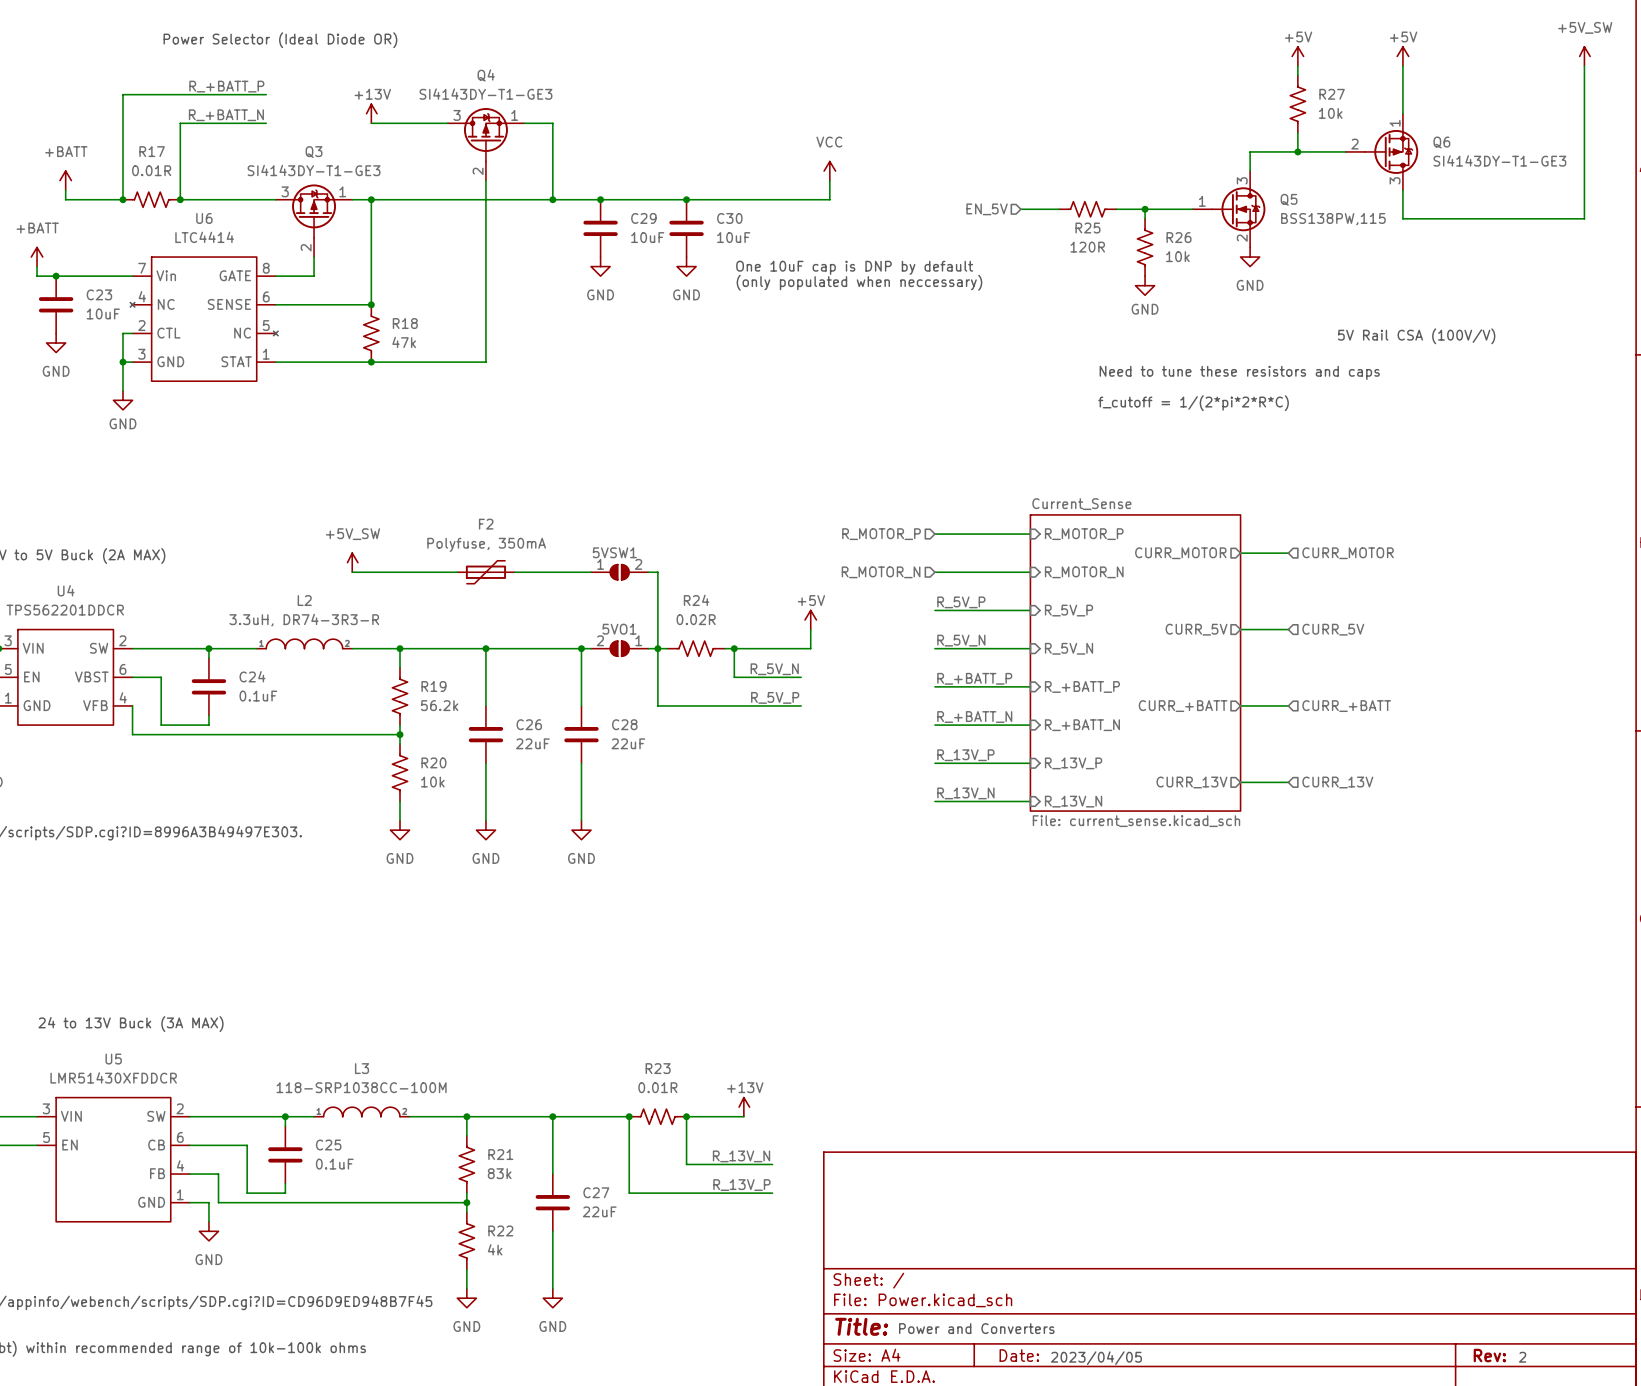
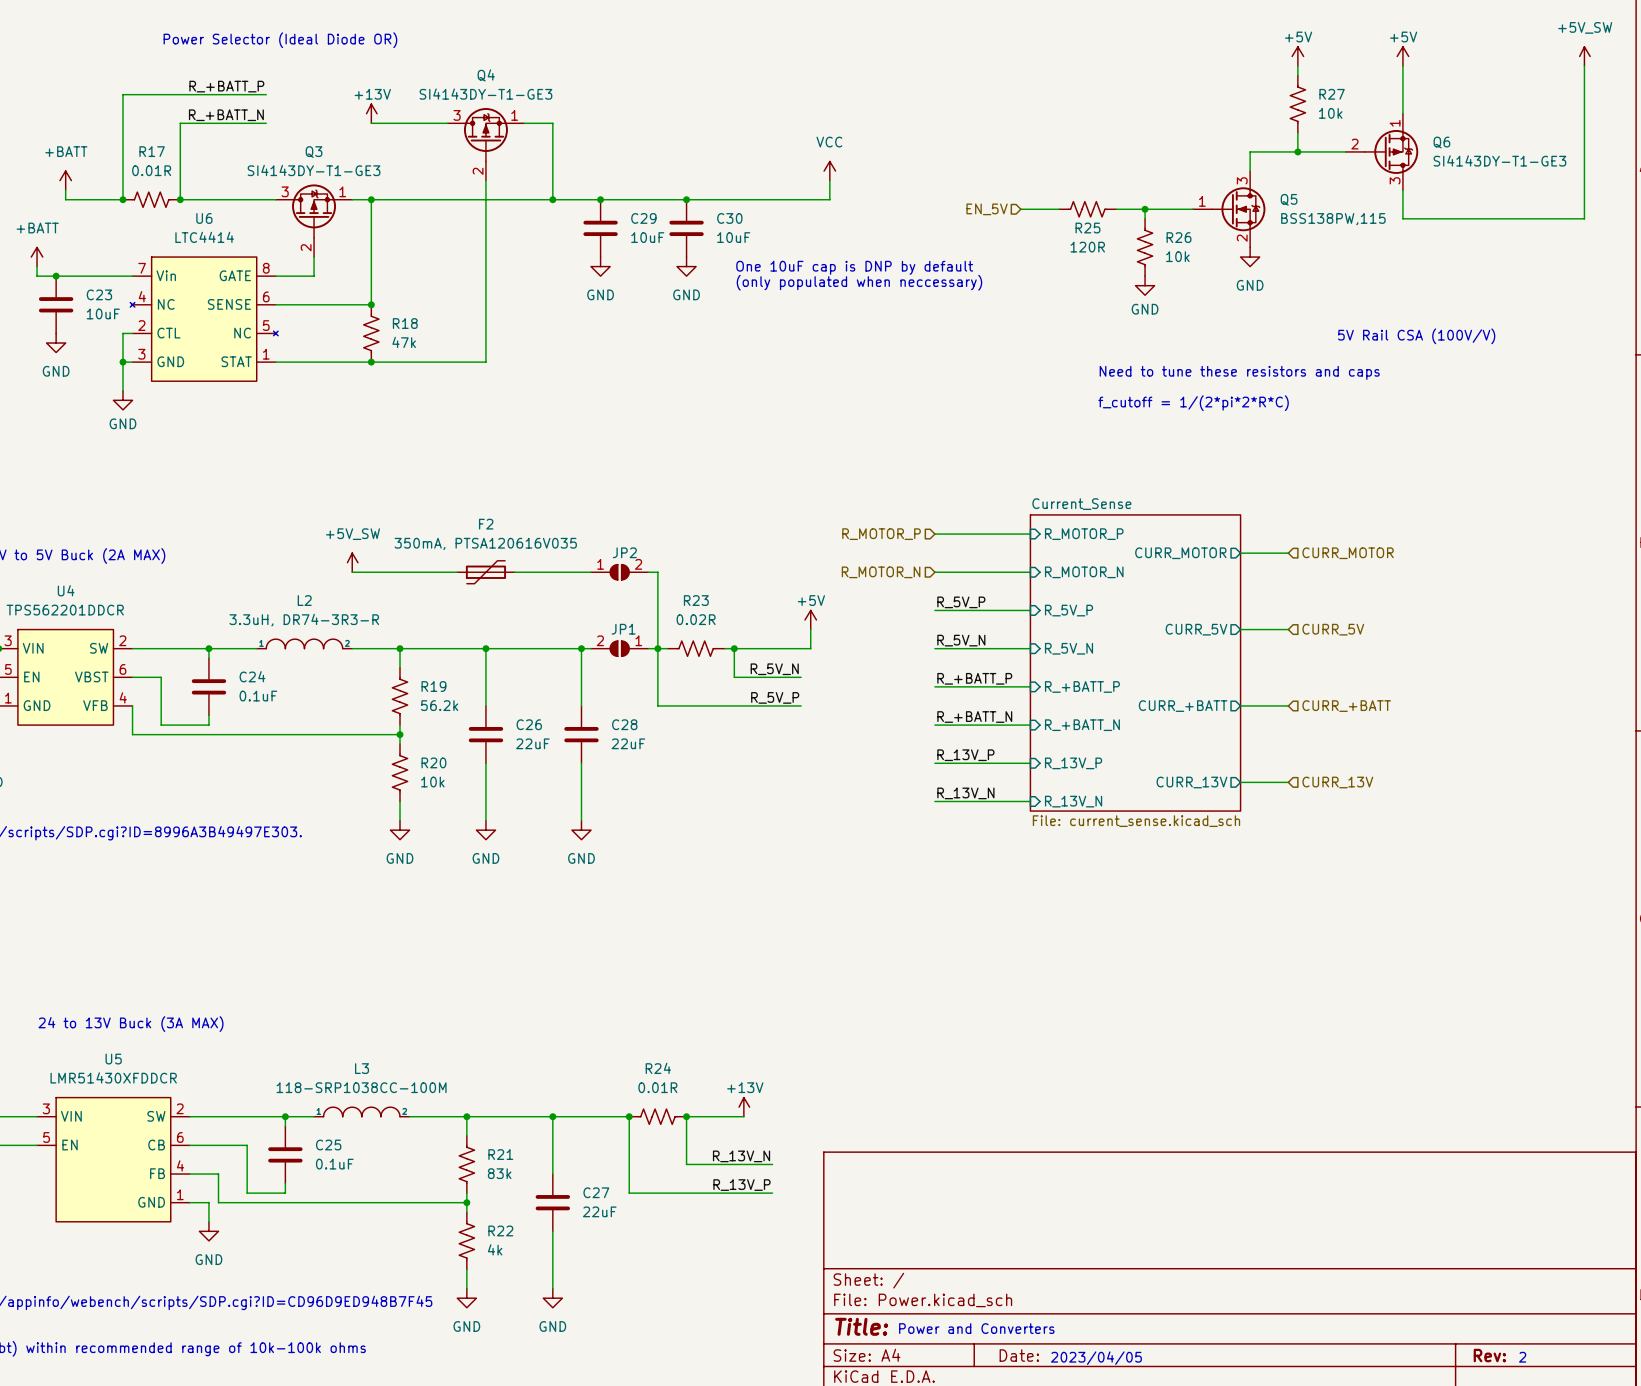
F2 value: Polyfuse, 350mA (486, 544) -> 350mA, PTSA120616V035 (485, 543)
5VSW1 name: 5VSW1 (614, 552) -> JP2 (624, 552)
R24 name: R24 (696, 600) -> R23 (696, 600)
5VO1 name: 5VO1 (619, 629) -> JP1 (623, 629)
R23 name: R23 (658, 1068) -> R24 (658, 1068)

